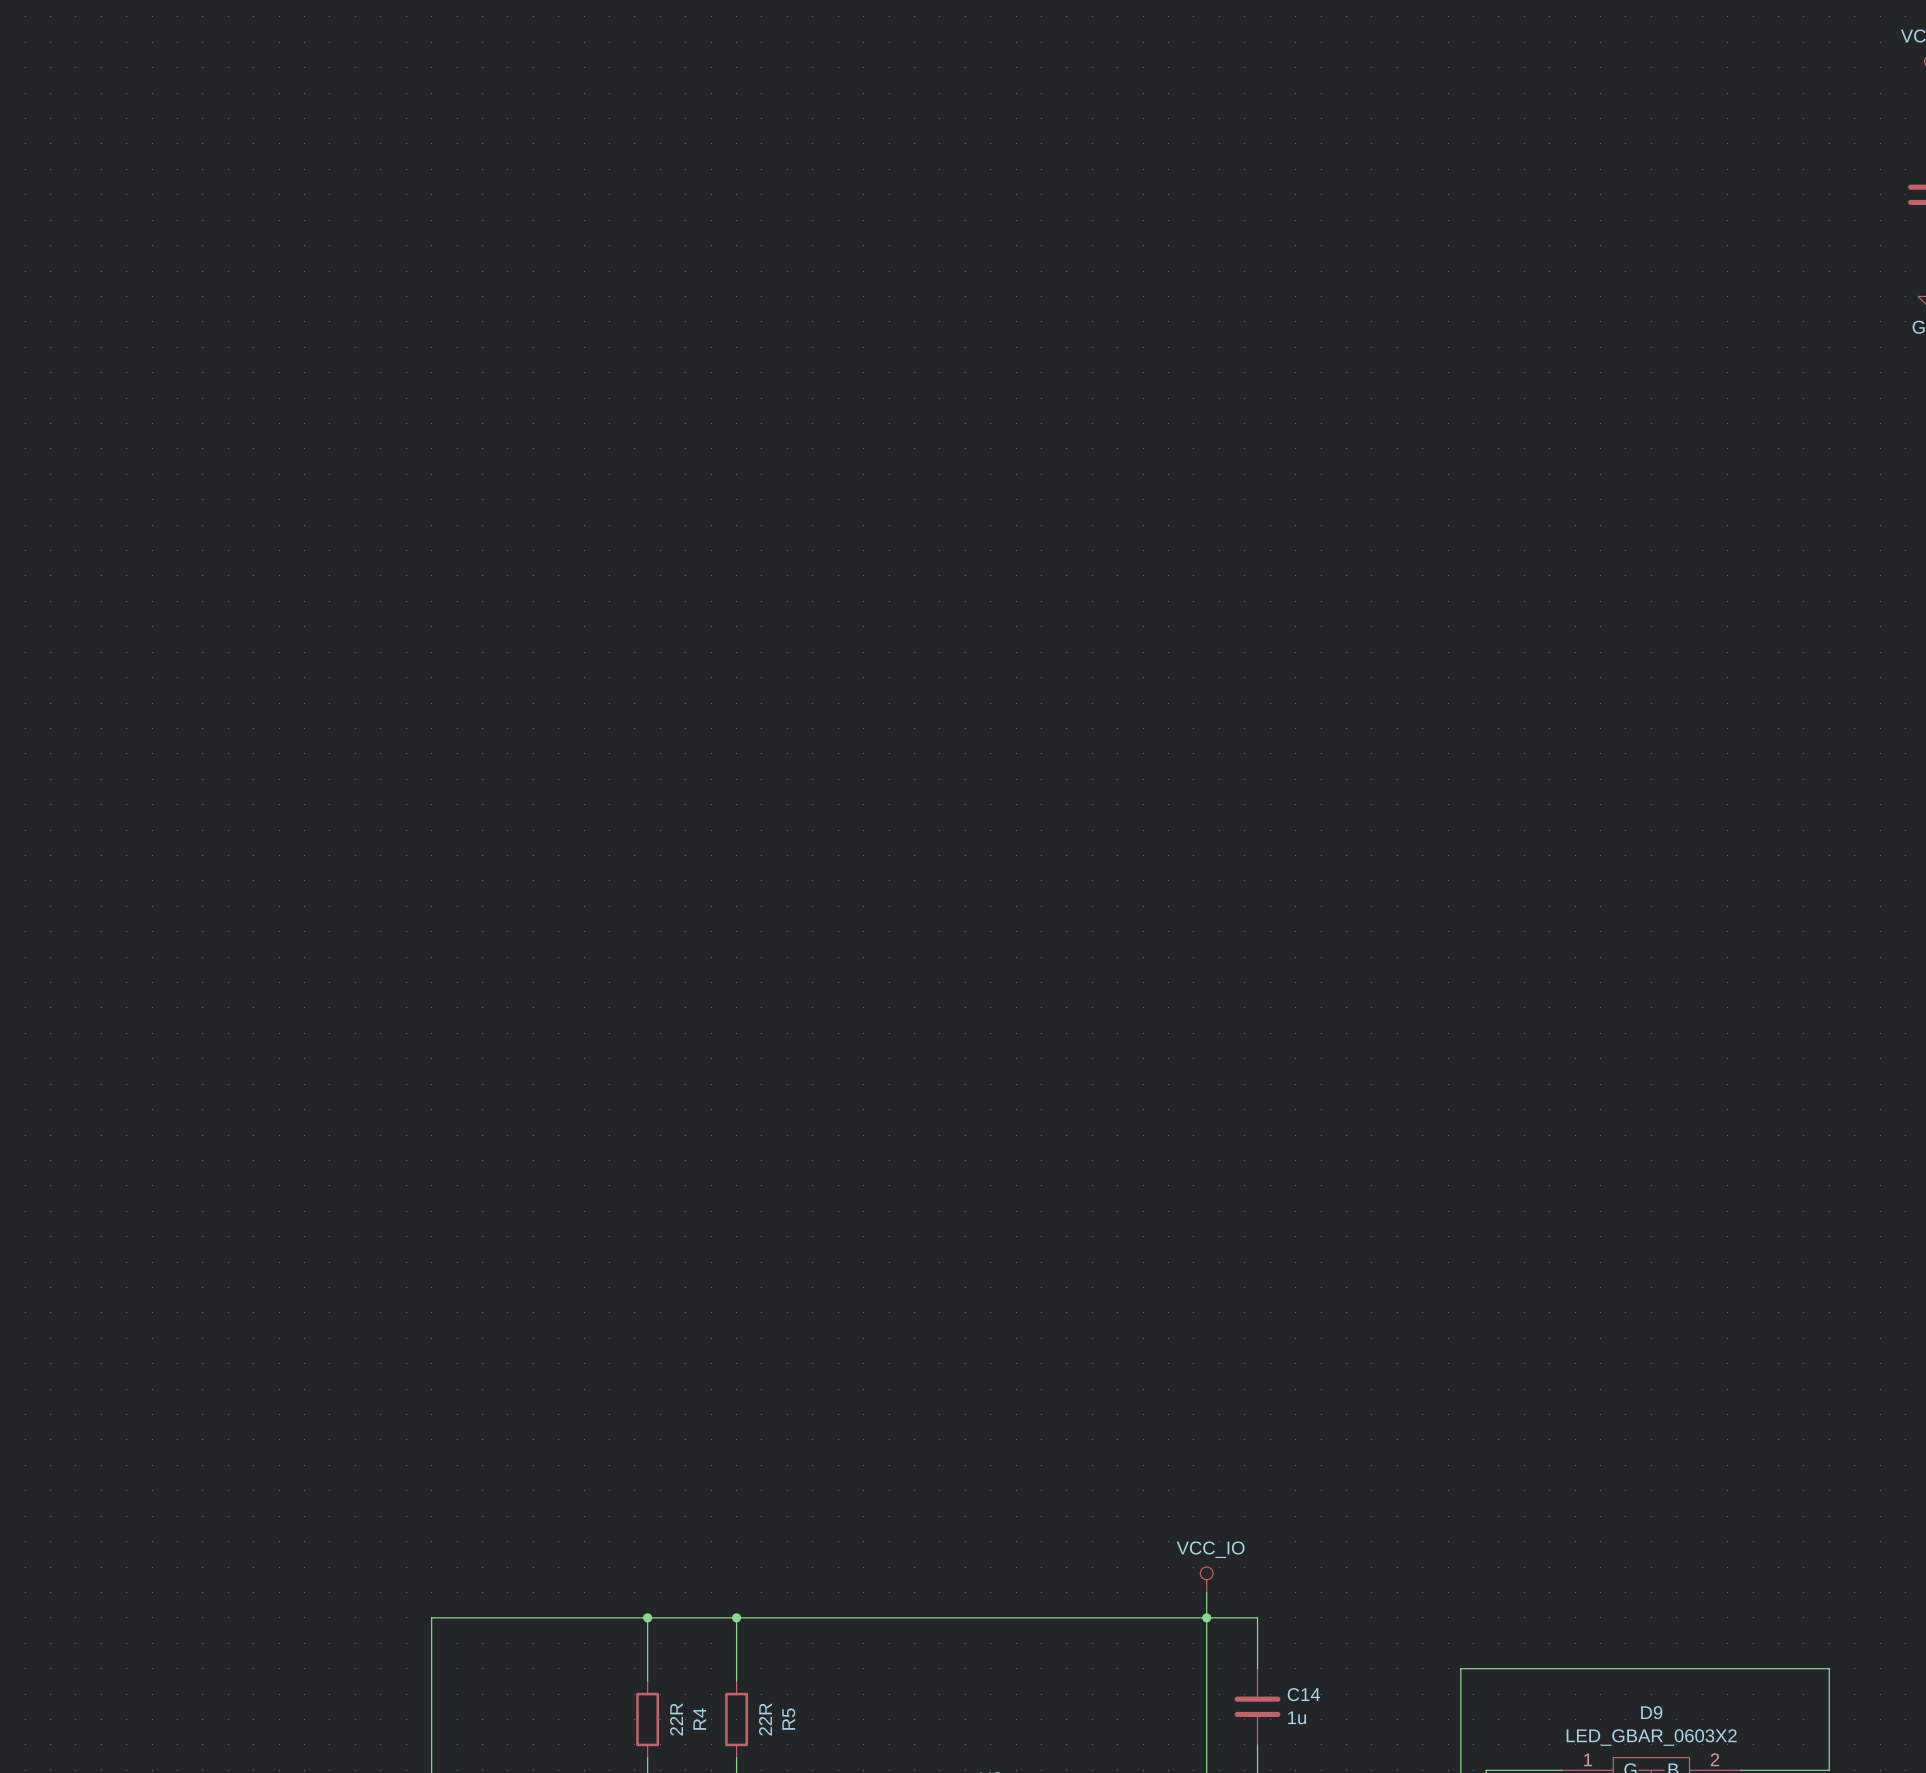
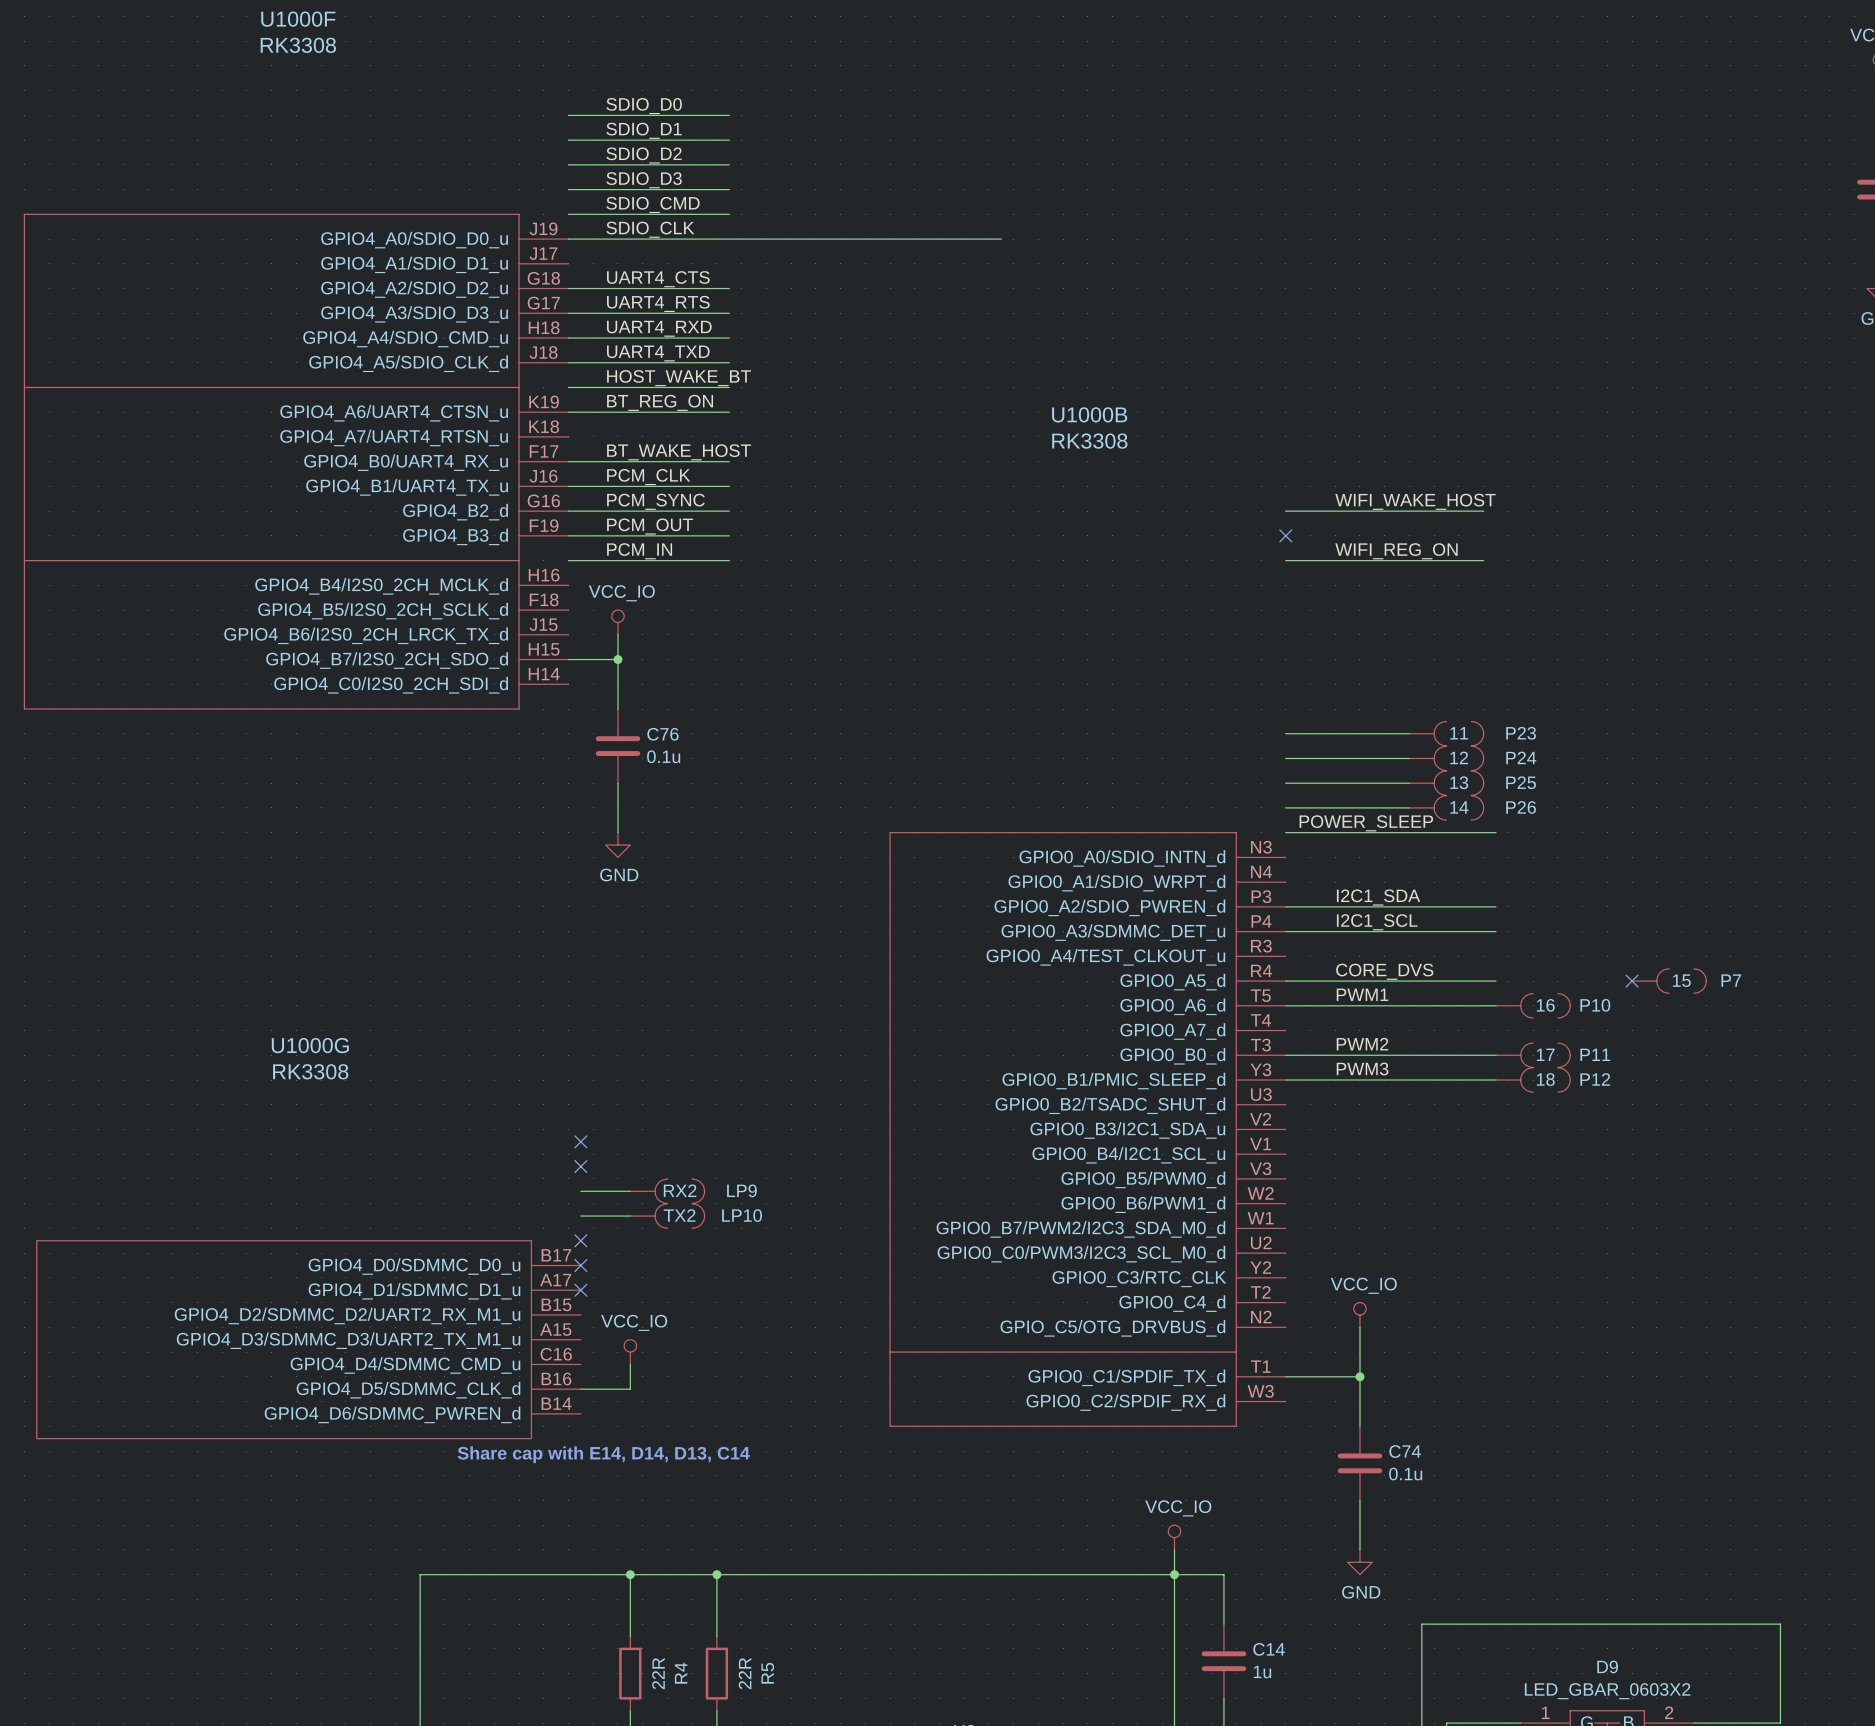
label: none -> SDIO_D0 (644, 106)
wire: none -> (568, 115) (729, 115)
label: none -> SDIO_D1 (644, 130)
wire: none -> (568, 140) (729, 140)
label: none -> SDIO_D2 (644, 155)
wire: none -> (568, 164) (729, 164)
label: none -> SDIO_D3 (644, 180)
wire: none -> (568, 189) (729, 189)
label: none -> SDIO_CMD (653, 205)
wire: none -> (568, 214) (729, 214)
label: none -> SDIO_CLK (650, 229)
wire: none -> (568, 239) (1001, 239)
label: none -> UART4_CTS (658, 279)
wire: none -> (568, 288) (729, 288)
label: none -> UART4_RTS (658, 303)
wire: none -> (568, 313) (729, 313)
label: none -> UART4_RXD (659, 328)
wire: none -> (568, 338) (729, 338)
label: none -> UART4_TXD (658, 353)
wire: none -> (568, 362) (729, 362)
label: none -> HOST_WAKE_BT (679, 378)
wire: none -> (568, 387) (729, 387)
label: none -> BT_REG_ON (660, 402)
wire: none -> (568, 412) (729, 412)
label: none -> BT_WAKE_HOST (679, 452)
U1000F: none -> RK3308 (296, 461)
wire: none -> (568, 461) (729, 461)
label: none -> PCM_CLK (648, 477)
wire: none -> (568, 486) (729, 486)
label: none -> PCM_SYNC (655, 501)
label: none -> WIFI_WAKE_HOST (1415, 501)
wire: none -> (568, 511) (729, 511)
wire: none -> (1285, 511) (1483, 511)
label: none -> PCM_OUT (650, 526)
wire: none -> (568, 535) (729, 535)
no-connect mark: none -> (1285, 535)
label: none -> PCM_IN (639, 551)
label: none -> WIFI_REG_ON (1396, 551)
wire: none -> (568, 560) (729, 560)
wire: none -> (1285, 560) (1483, 560)
power symbol: none -> VCC_IO (617, 622)
wire: none -> (617, 634) (617, 709)
wire: none -> (568, 659) (617, 659)
junction: none -> (617, 659)
wire: none -> (1285, 733) (1409, 733)
P23: none -> 11 (1446, 733)
C76: none -> 0.1u (617, 746)
wire: none -> (1285, 758) (1409, 758)
P24: none -> 12 (1446, 758)
wire: none -> (617, 783) (617, 832)
wire: none -> (1285, 783) (1409, 783)
P25: none -> 13 (1446, 783)
wire: none -> (1285, 807) (1409, 807)
P26: none -> 14 (1446, 807)
label: none -> POWER_SLEEP (1366, 823)
wire: none -> (1285, 832) (1496, 832)
power symbol: none -> GND (617, 845)
label: none -> I2C1_SDA (1378, 897)
wire: none -> (1285, 906) (1496, 906)
label: none -> I2C1_SCL (1377, 922)
wire: none -> (1285, 931) (1496, 931)
label: none -> CORE_DVS (1384, 971)
wire: none -> (1285, 981) (1496, 981)
no-connect mark: none -> (1632, 981)
P7: none -> 15 (1669, 981)
label: none -> PWM1 (1362, 994)
wire: none -> (1285, 1005) (1496, 1005)
P10: none -> 16 (1533, 1005)
label: none -> PWM2 (1362, 1044)
wire: none -> (1285, 1055) (1496, 1055)
P11: none -> 17 (1533, 1055)
label: none -> PWM3 (1362, 1068)
wire: none -> (1285, 1080) (1496, 1080)
P12: none -> 18 (1533, 1080)
U1000B: none -> RK3308 (1087, 1129)
no-connect mark: none -> (580, 1141)
no-connect mark: none -> (580, 1166)
wire: none -> (580, 1191) (630, 1191)
LP9: none -> RX2 (667, 1191)
wire: none -> (580, 1216) (630, 1216)
LP10: none -> TX2 (667, 1216)
no-connect mark: none -> (580, 1240)
no-connect mark: none -> (580, 1265)
no-connect mark: none -> (580, 1290)
power symbol: none -> VCC_IO (1359, 1314)
wire: none -> (1359, 1327) (1359, 1426)
U1000G: none -> RK3308 (308, 1339)
power symbol: none -> VCC_IO (630, 1352)
wire: none -> (630, 1364) (630, 1389) (580, 1389)
wire: none -> (1285, 1376) (1359, 1376)
junction: none -> (1359, 1376)
text: none -> Share cap with E14, D14, D13, C14 (603, 1454)
C74: none -> 0.1u (1359, 1463)
wire: none -> (1359, 1500) (1359, 1549)
power symbol: none -> GND (1359, 1562)

